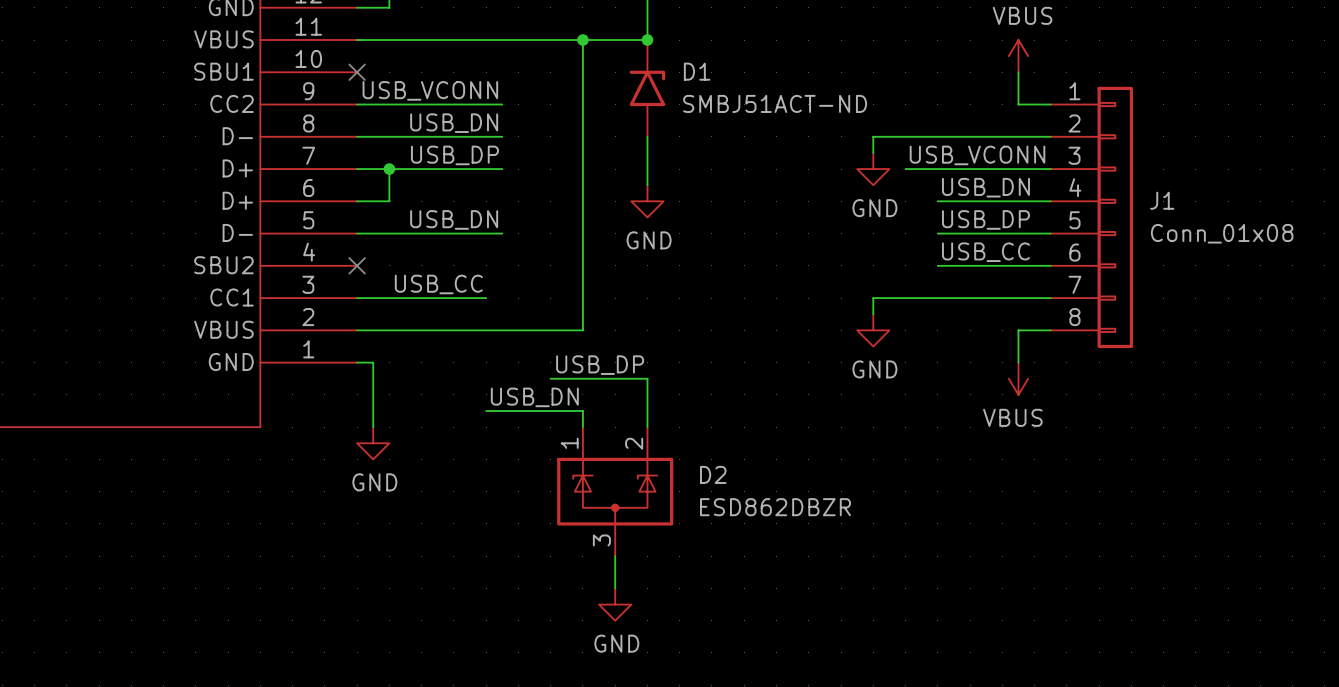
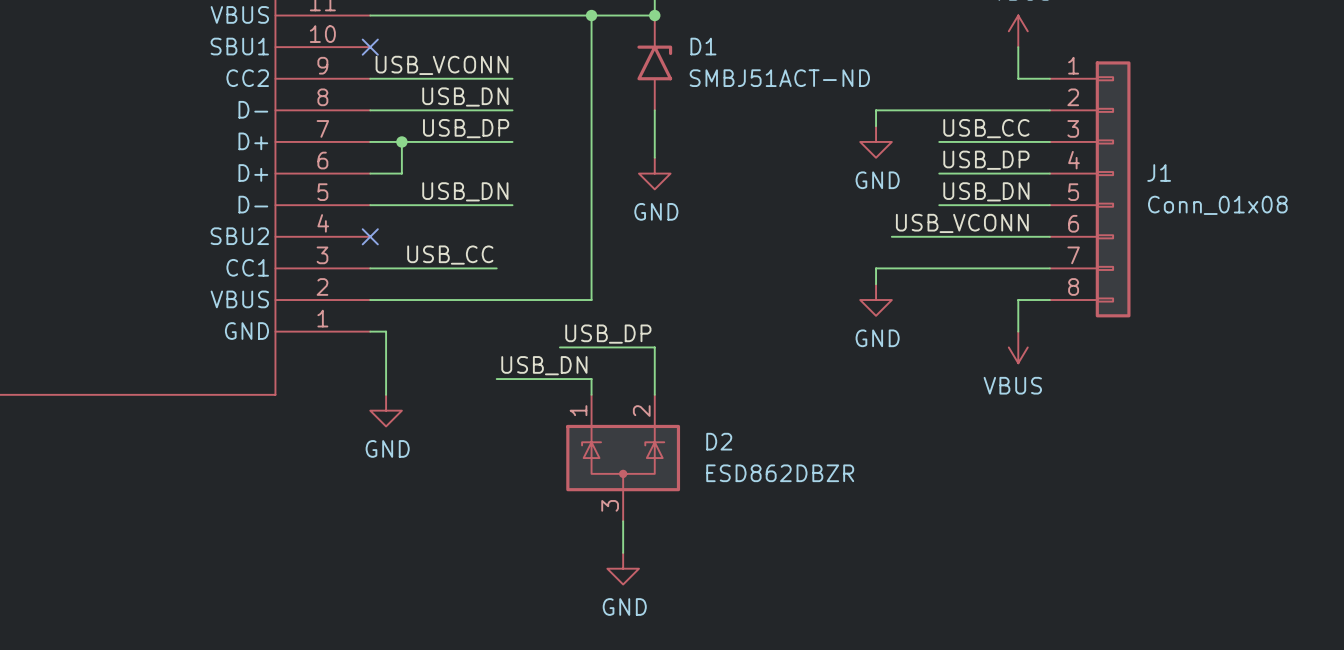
label position: USB_VCONN (977, 155) -> USB_VCONN (962, 223)
wire: (905, 169) (937, 169) -> none
label: USB_DN (985, 187) -> USB_DP (986, 160)
label: USB_DP (985, 219) -> USB_DN (986, 191)
label position: USB_CC (985, 252) -> USB_CC (986, 128)
wire: none -> (891, 236) (939, 236)

